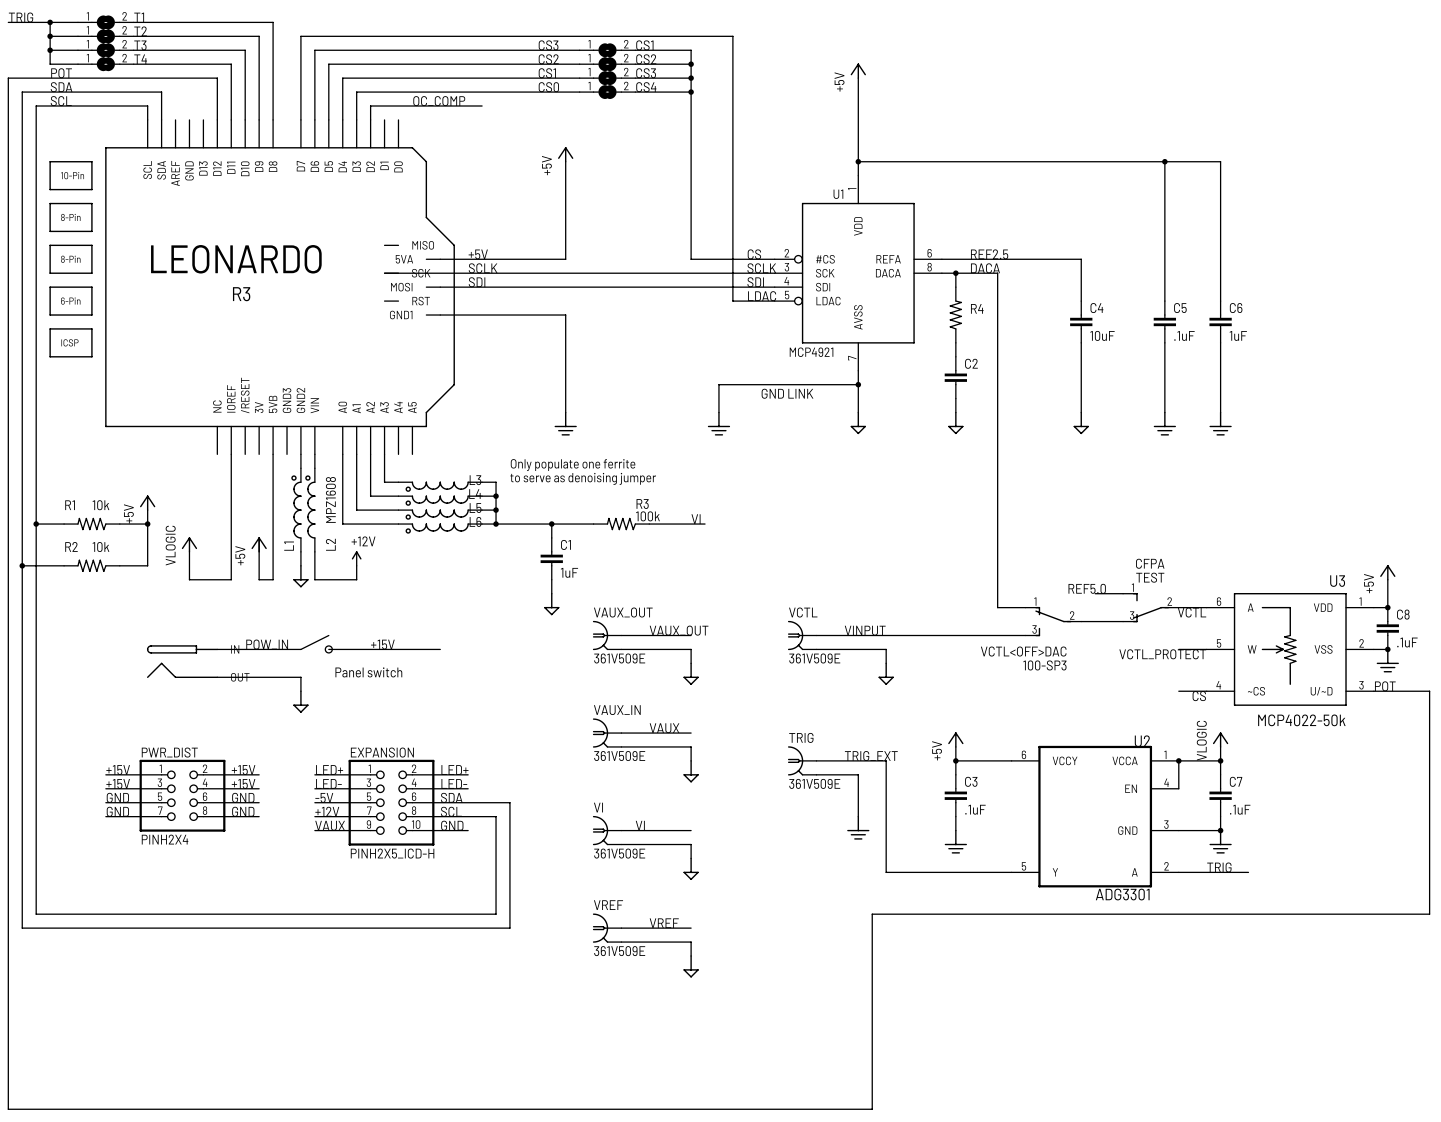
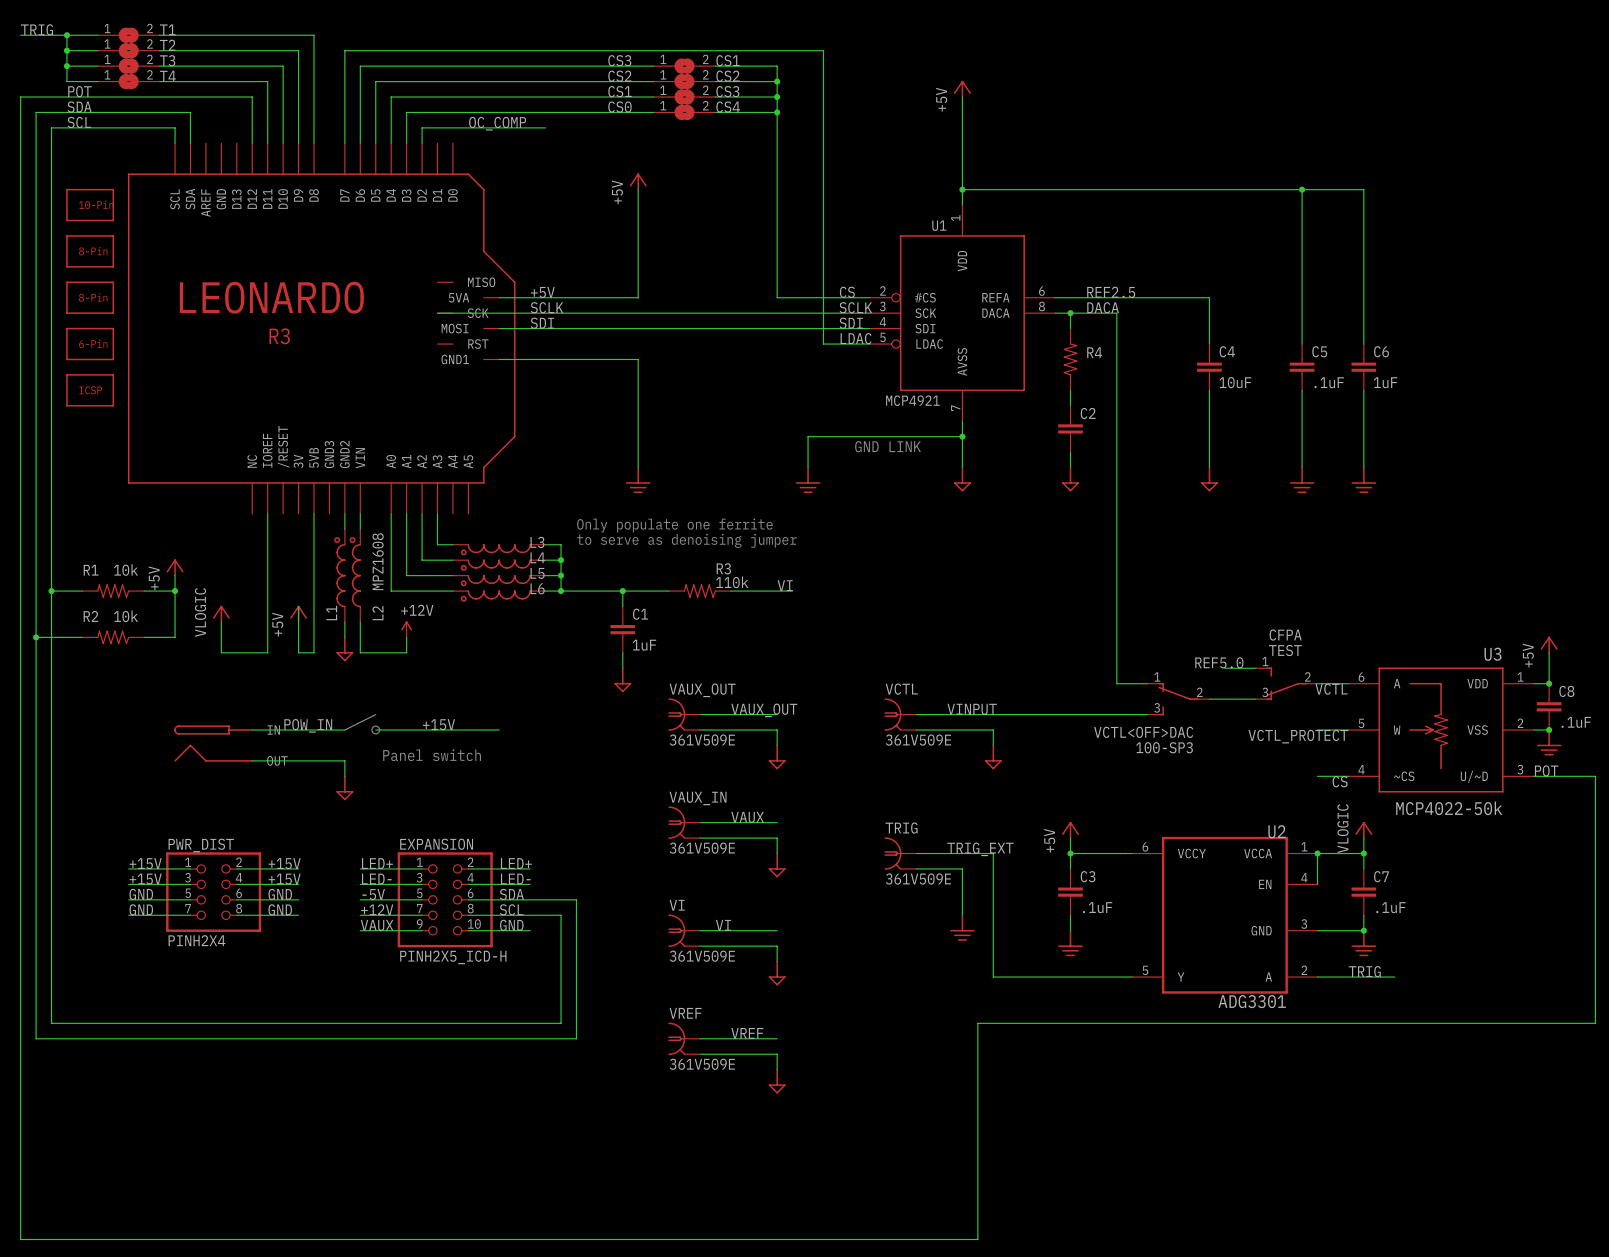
R3 value: 100k (647, 516) -> 110k (732, 582)

